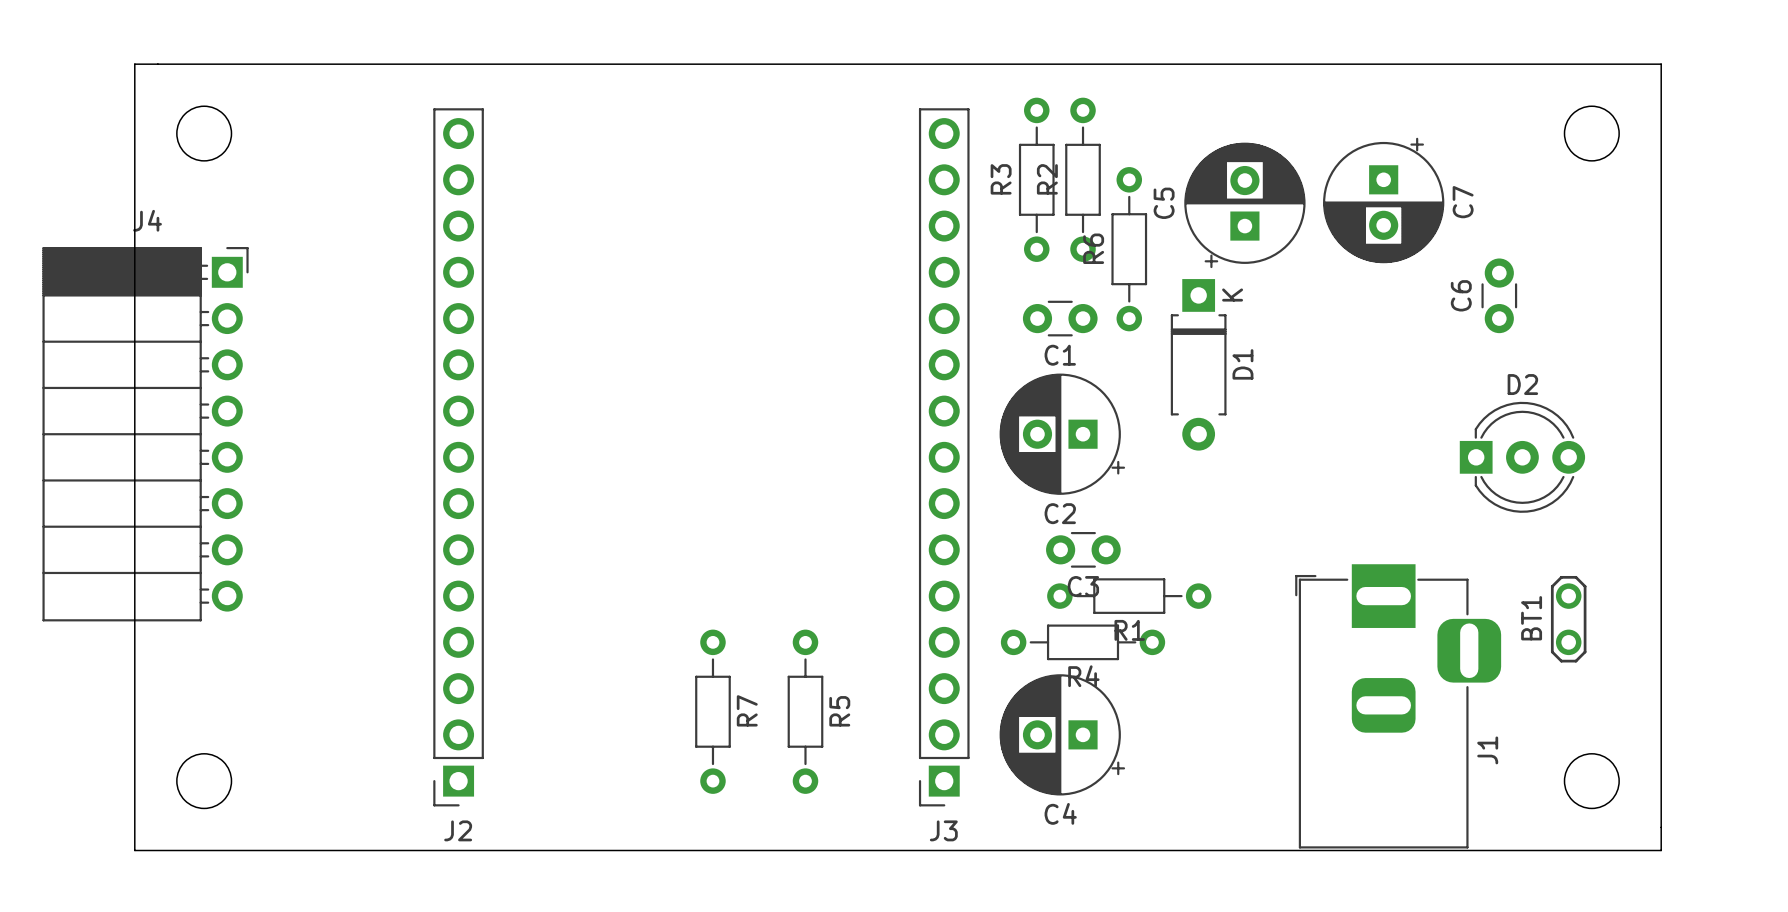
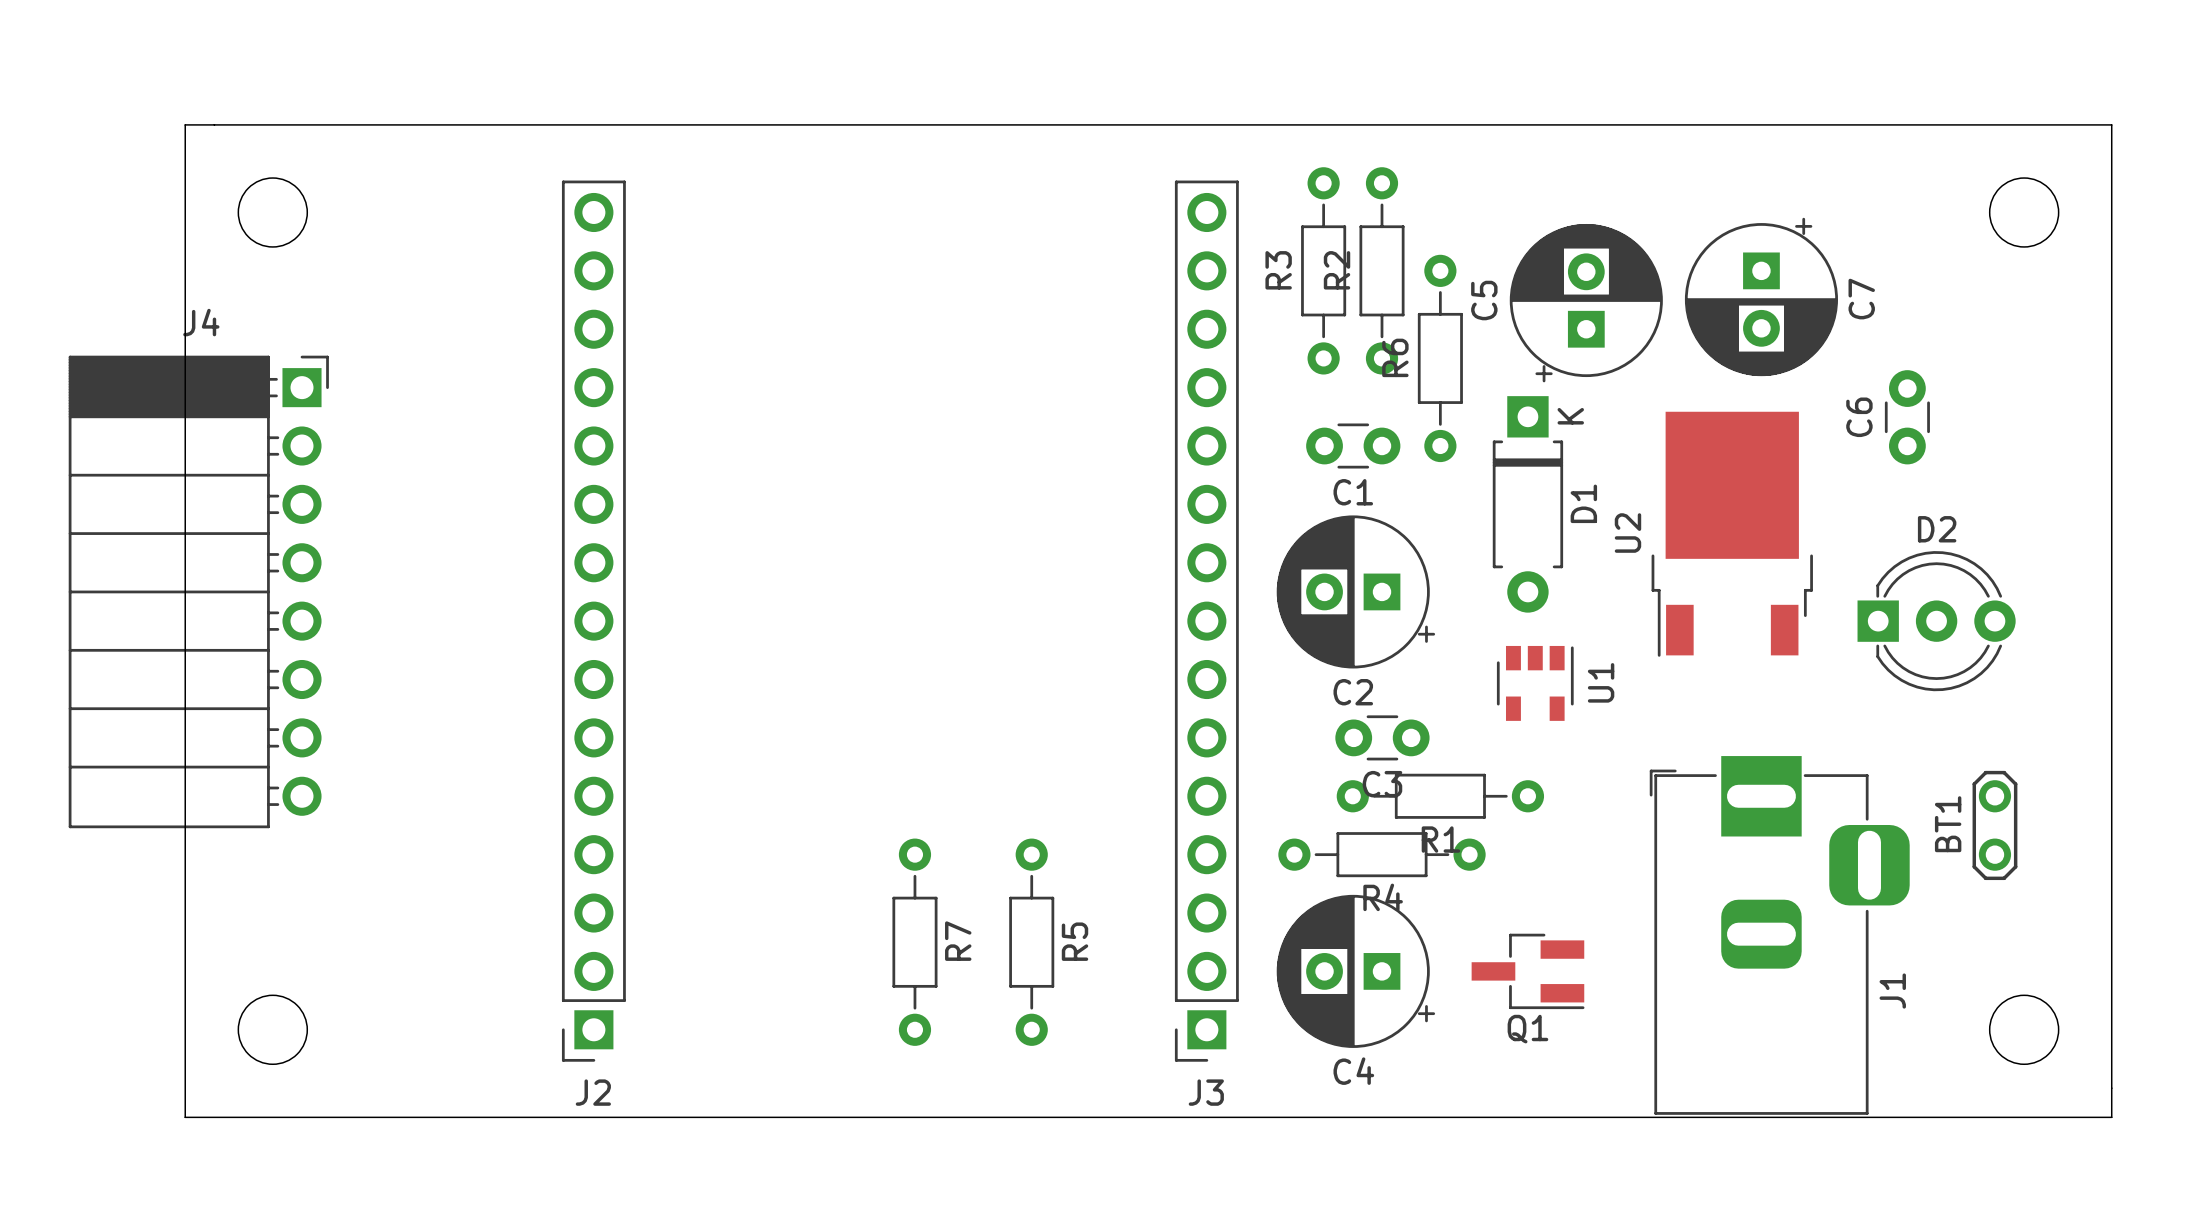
U2: none -> (1732, 534)
U1: none -> (1535, 683)
Q1: none -> (1528, 971)

